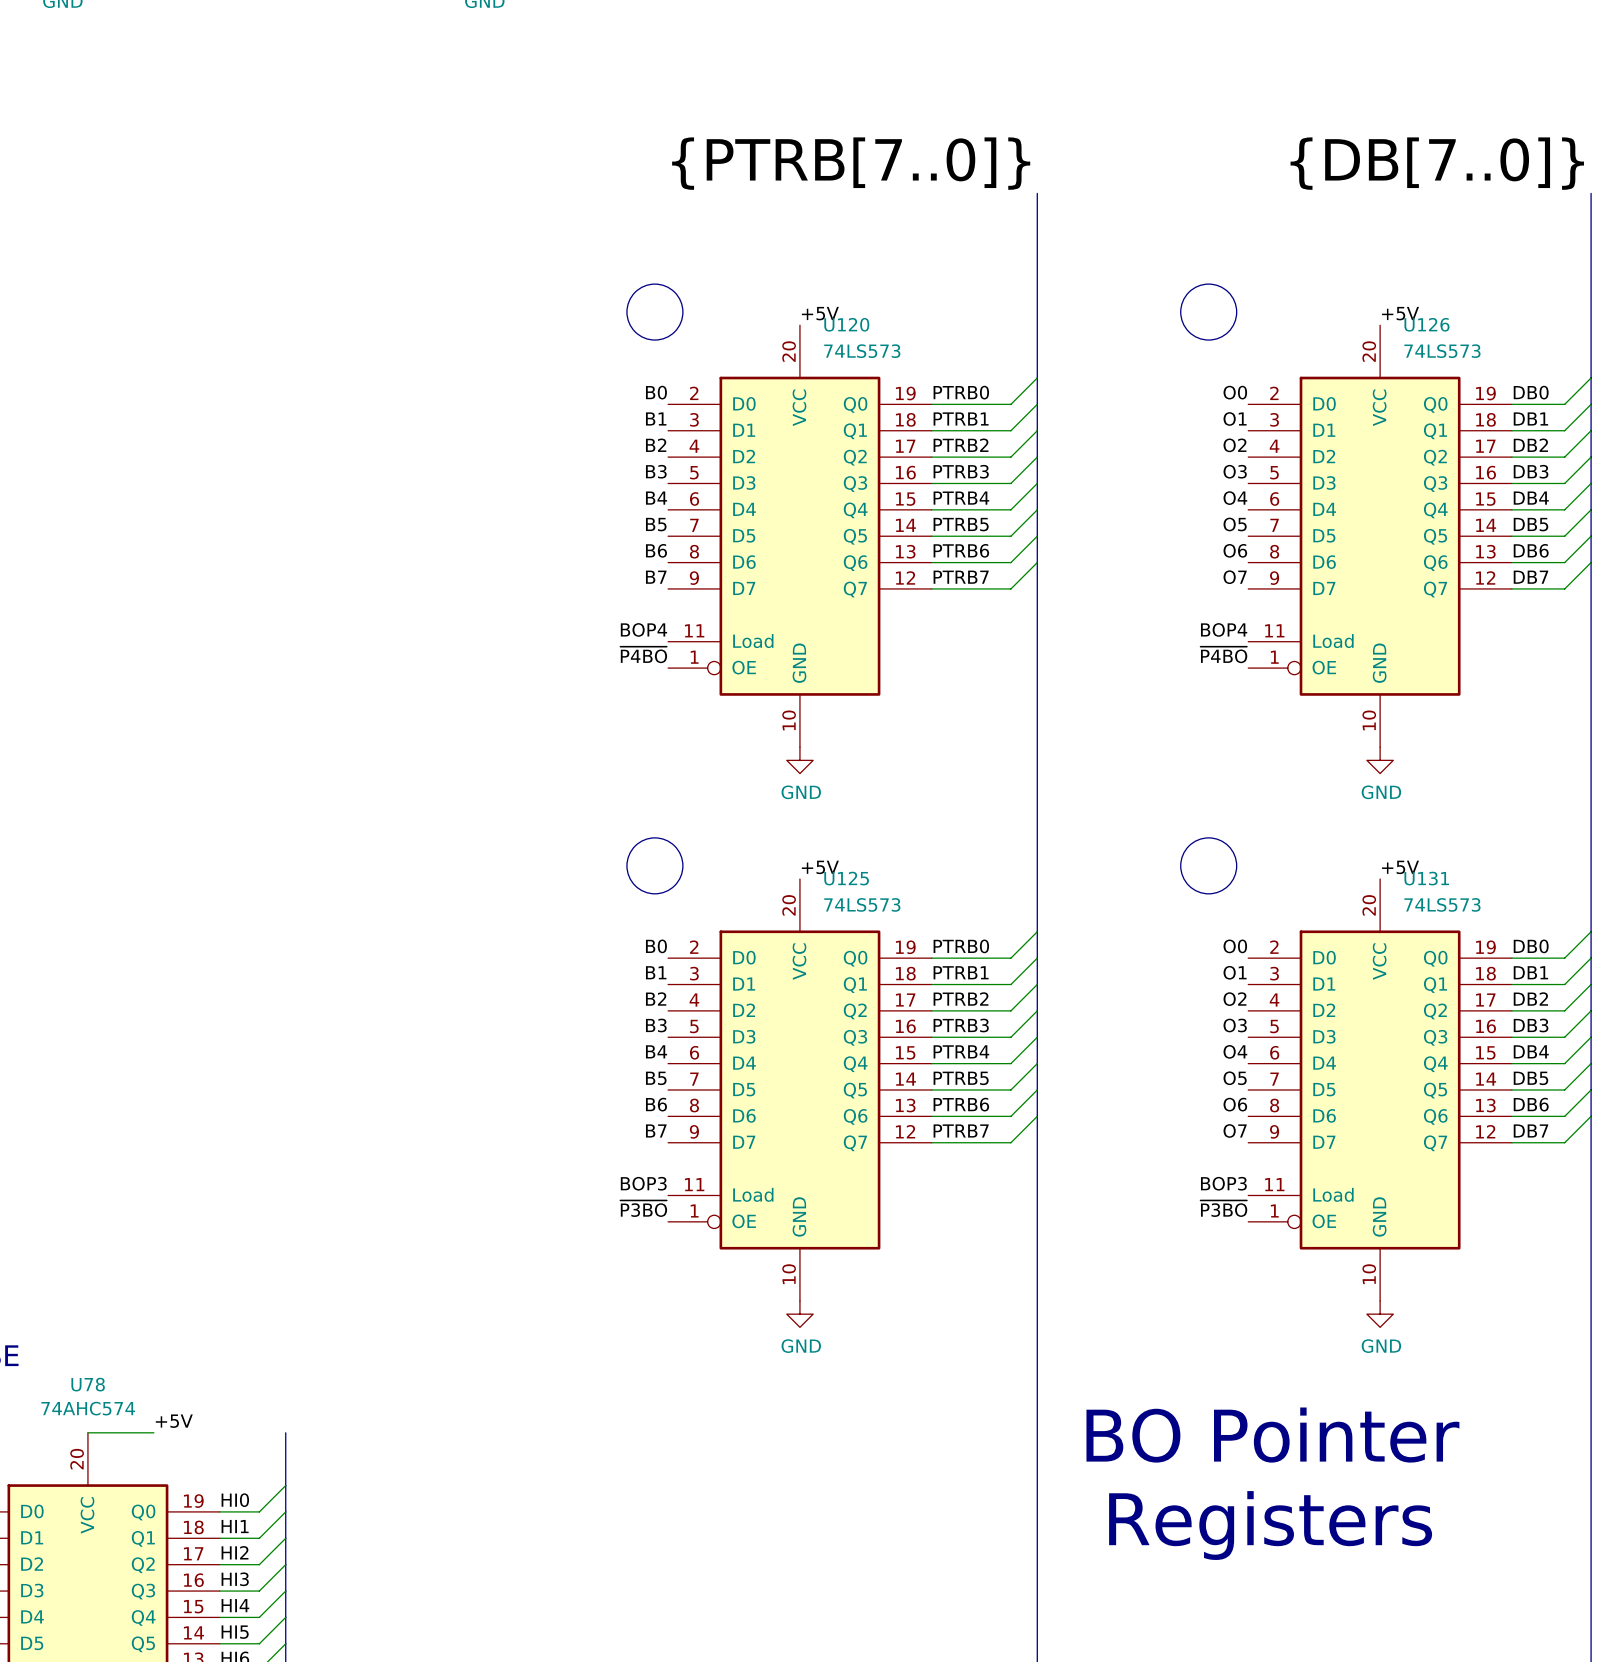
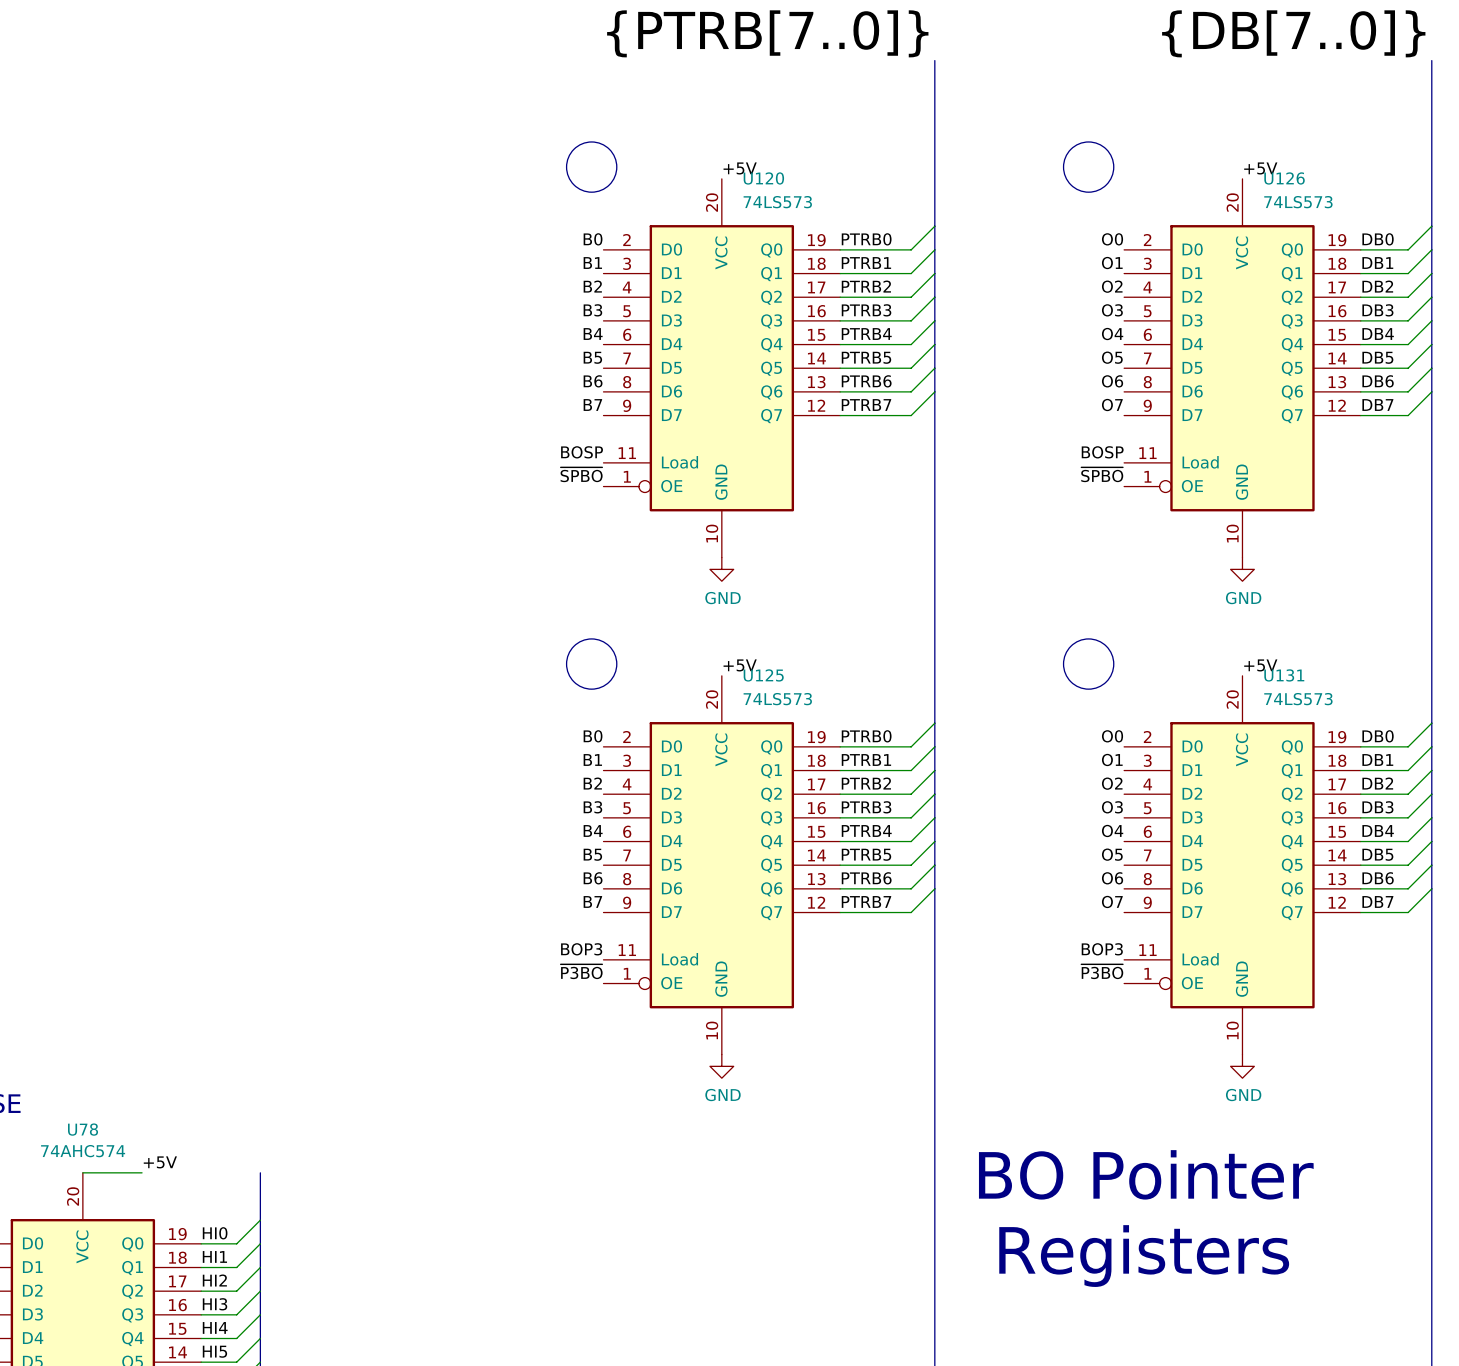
label: BOP4 (643, 629) -> BOSP (582, 452)
label: BOP4 (1224, 629) -> BOSP (1102, 452)
label: ~{P4BO} (643, 654) -> ~{SPBO} (581, 474)
label: ~{P4BO} (1223, 654) -> ~{SPBO} (1102, 474)

